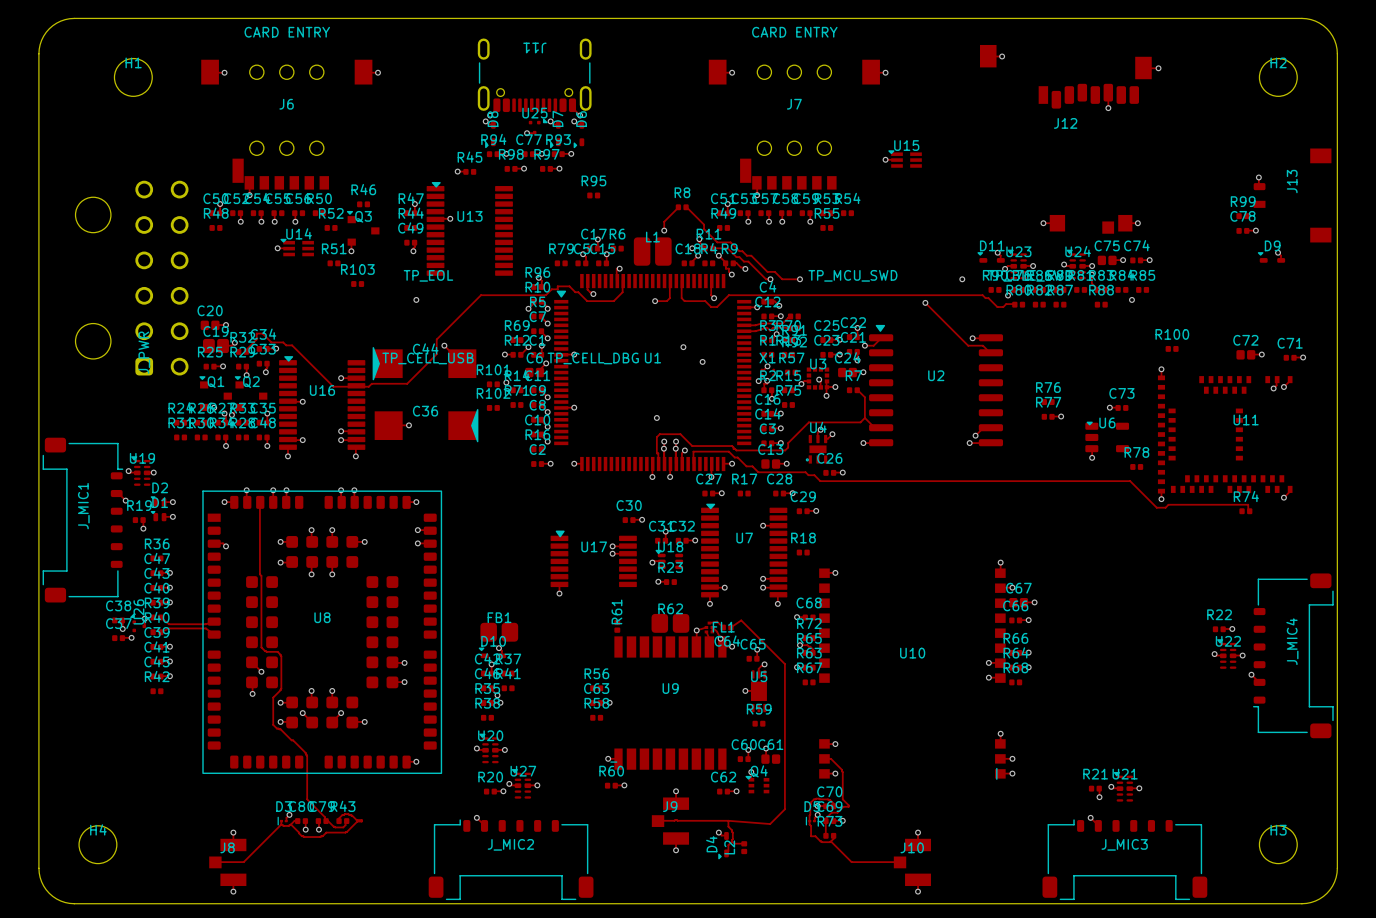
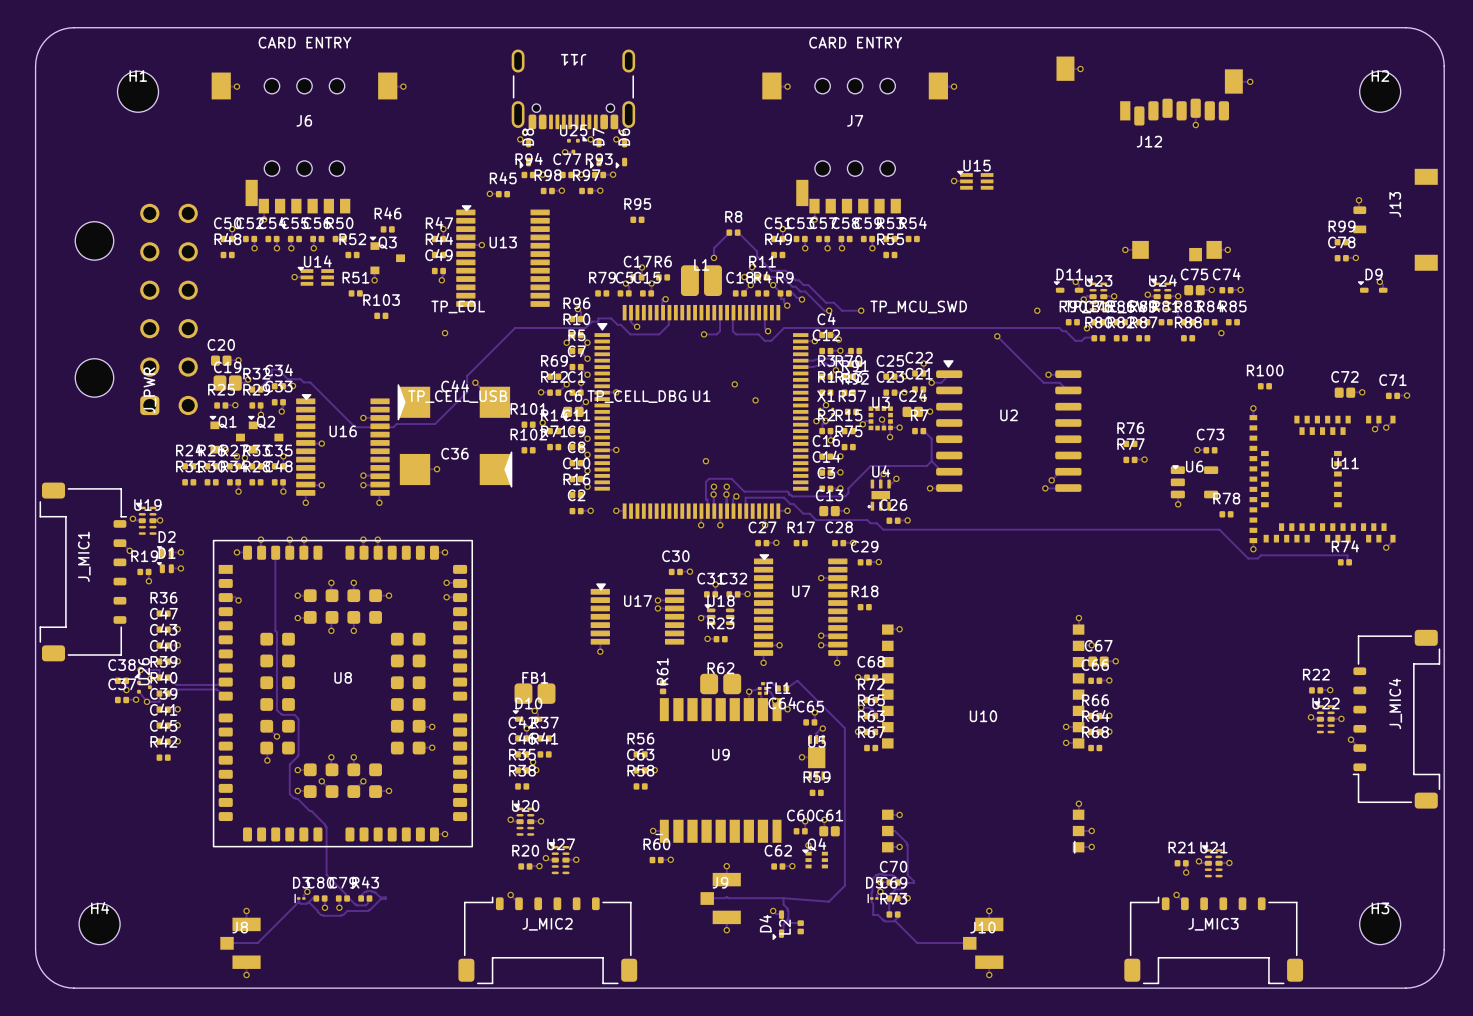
via: none -> (140, 669)
track: none -> (159, 677) (159, 669) (140, 669) (138, 682)
track: none -> (138, 691) (146, 701) (159, 701) (159, 693)
via: none -> (146, 701)

